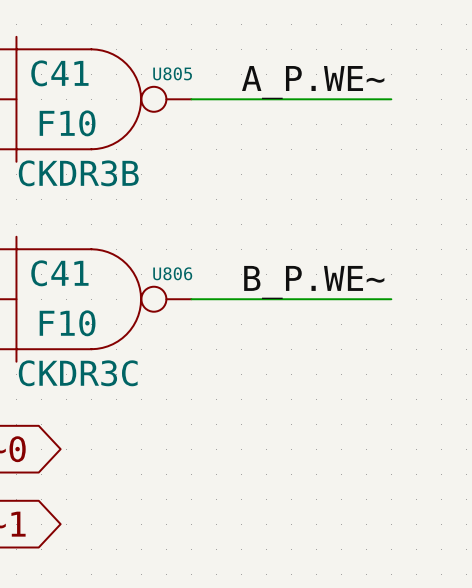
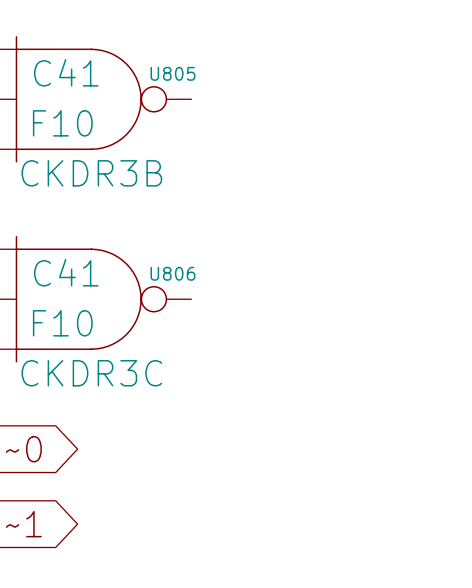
label: A_P.WE~ (313, 82) -> none
wire: (191, 99) (391, 99) -> none
label: B_P.WE~ (314, 282) -> none
wire: (191, 299) (391, 299) -> none

